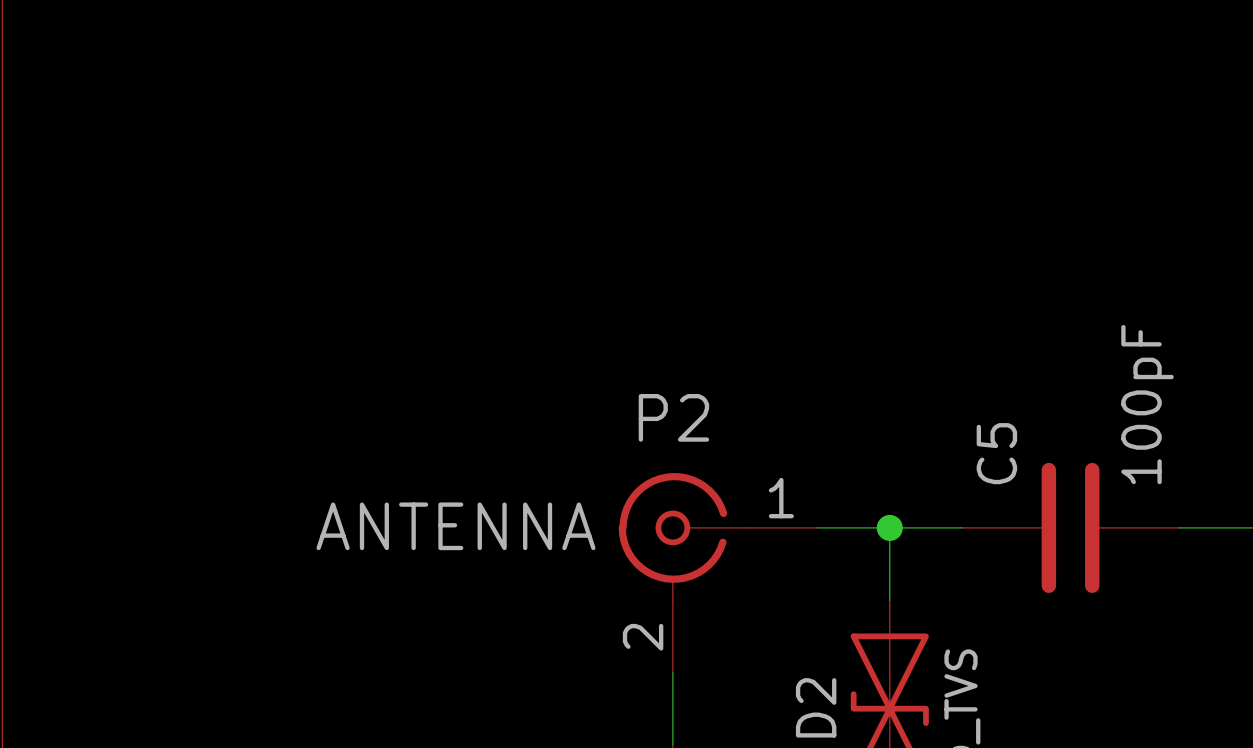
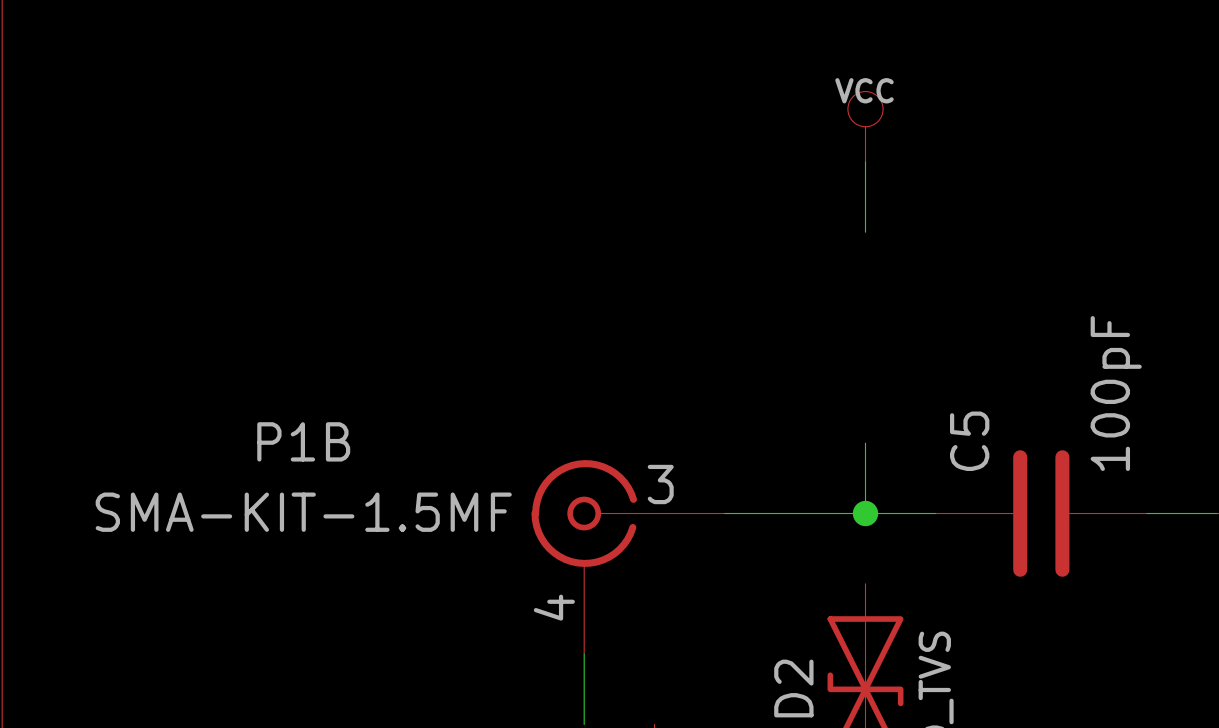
power symbol: none -> VCC (865, 126)
wire: none -> (865, 161) (865, 232)
wire: (889, 527) (889, 600) -> (865, 513) (865, 443)
P1B: none -> SMA-KIT-1.5MF (628, 557)
P2: ANTENNA (718, 572) -> none
wire: (672, 672) (672, 744) -> (584, 654) (584, 724)

